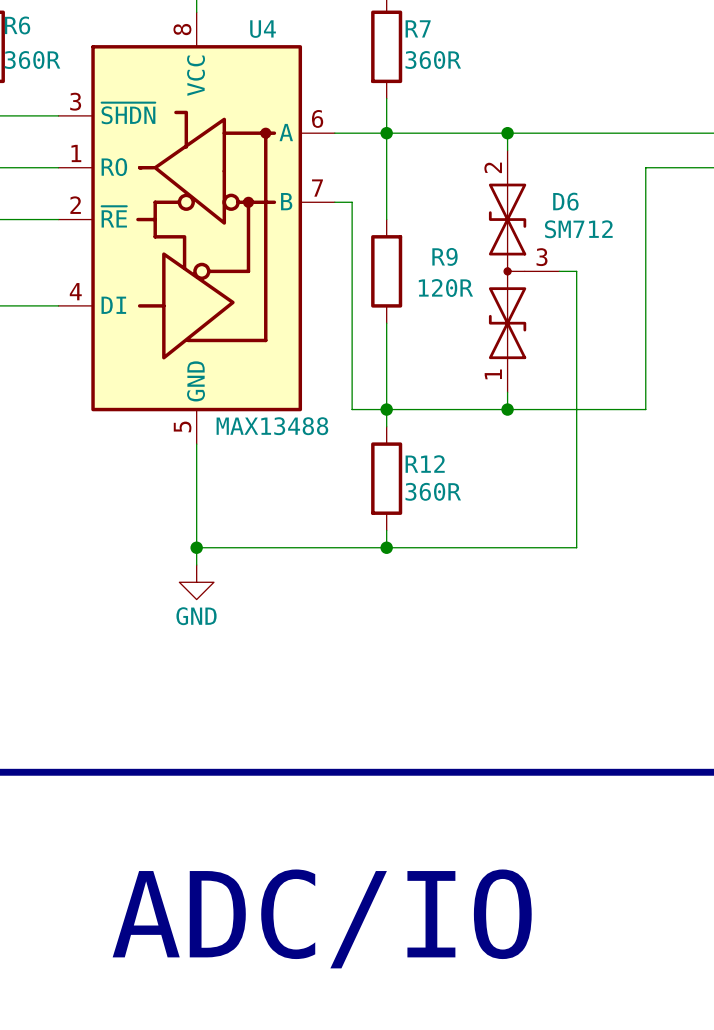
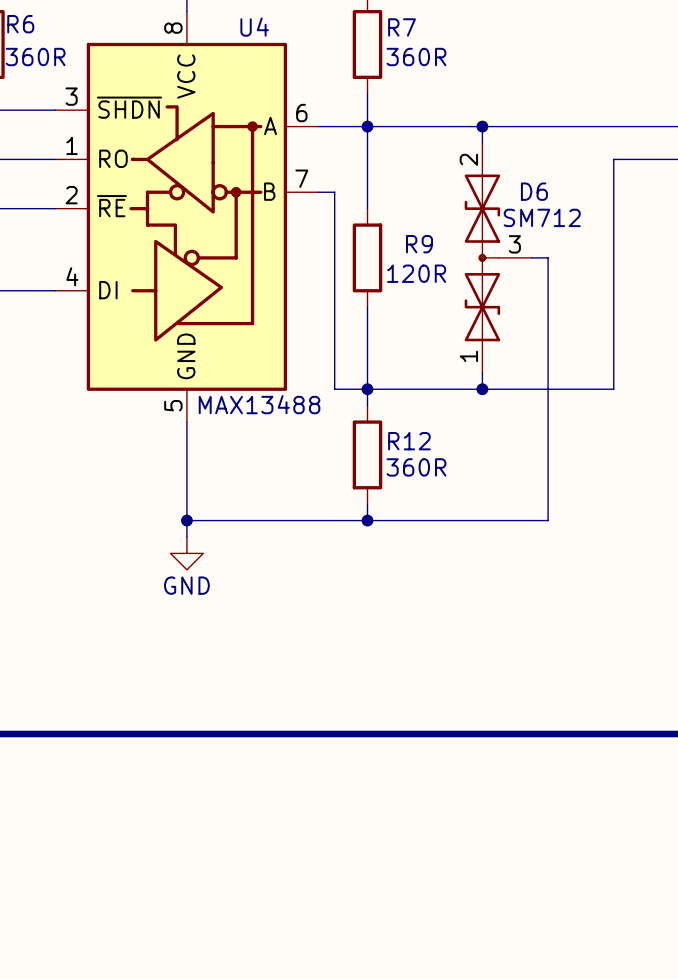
text: ADC/IO (322, 918) -> none

